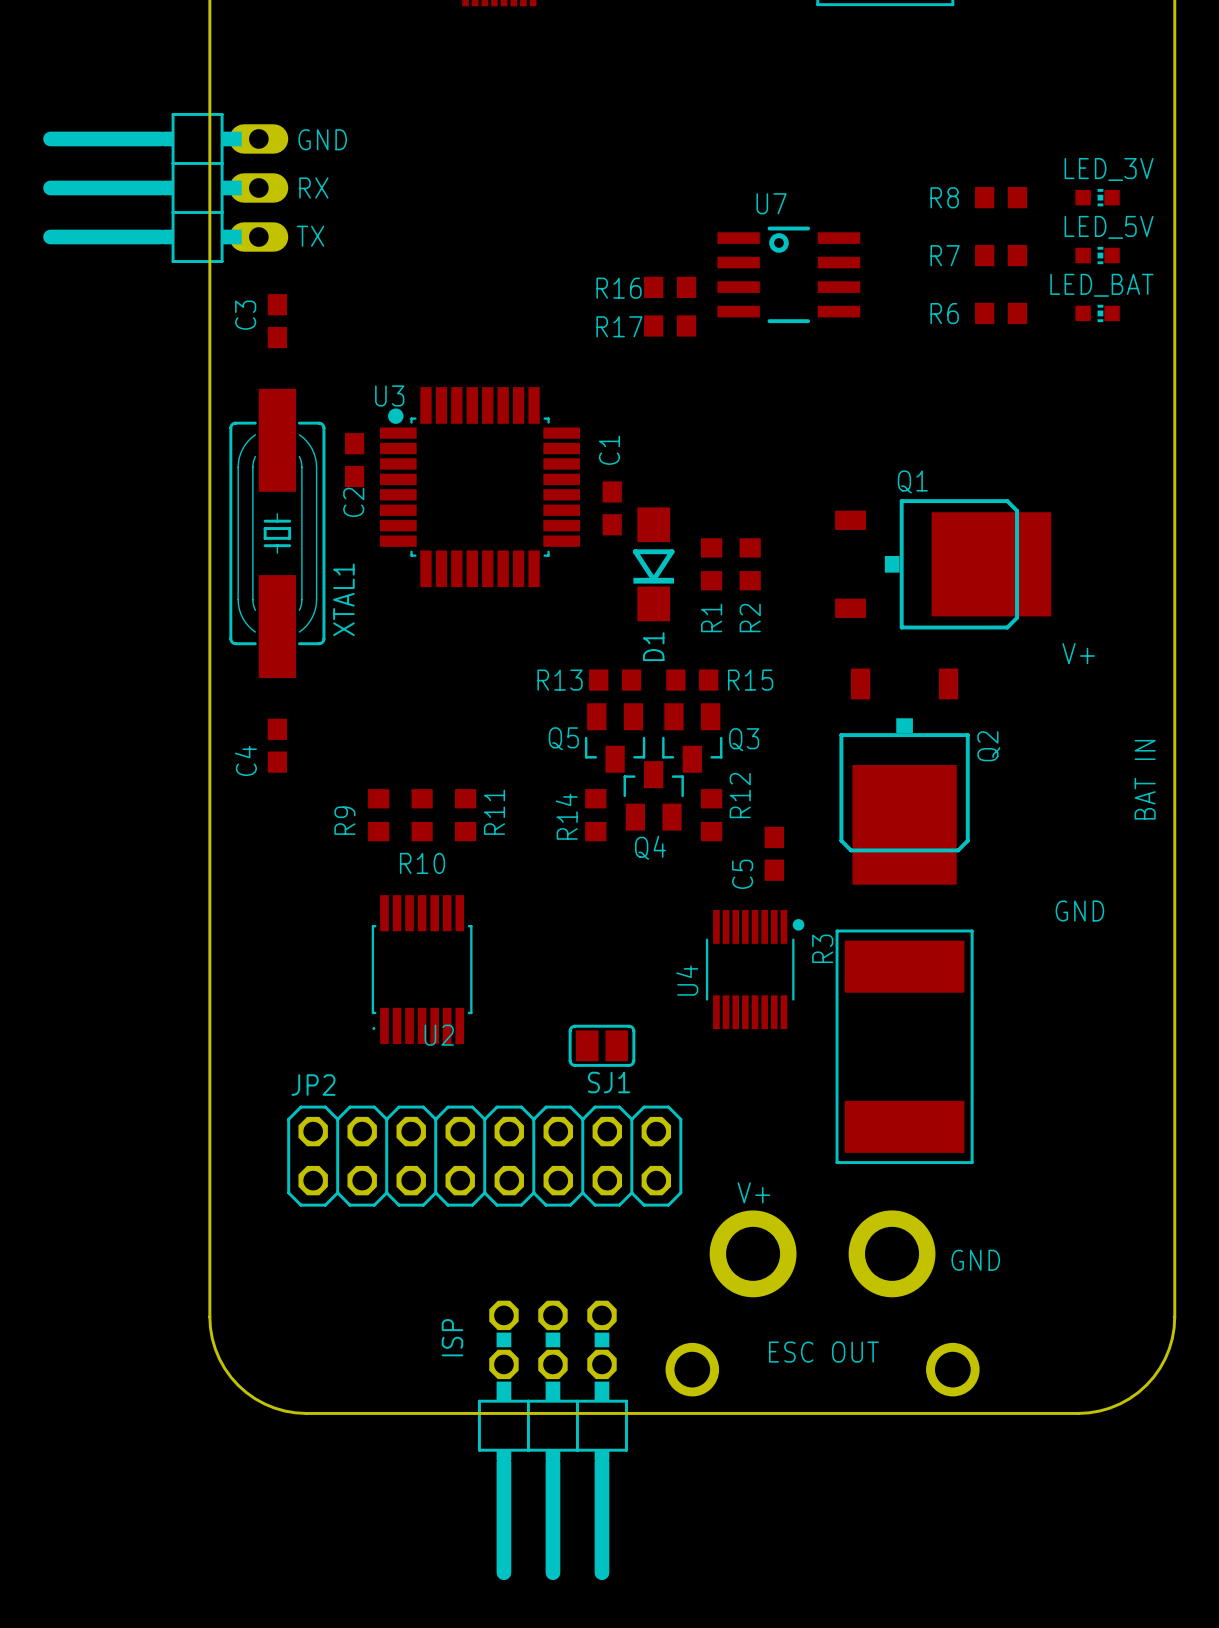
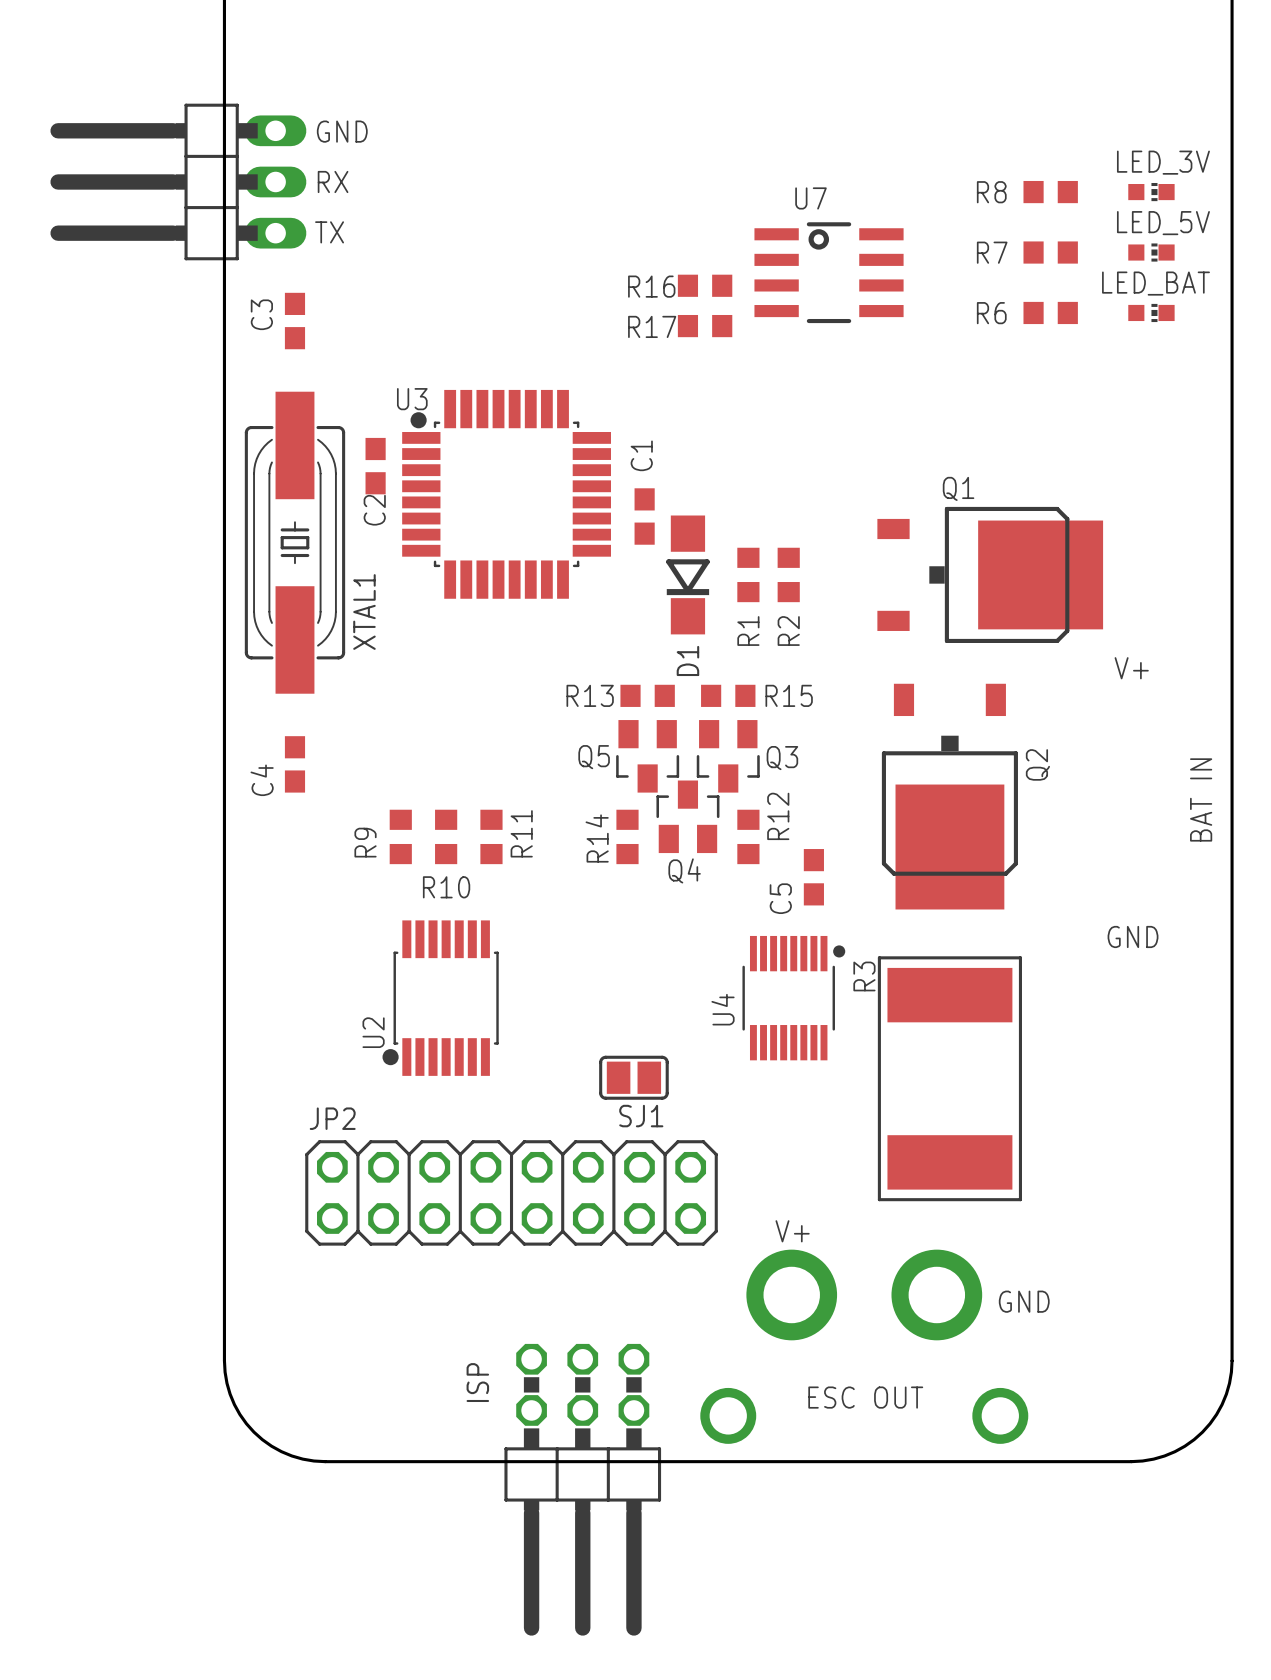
U2 footprint: [371, 895, 473, 1045] -> [382, 920, 499, 1076]
U2 name rotation: 0° (439, 1035) -> 90° counterclockwise (373, 1032)
U2 name position: U2 (439, 1035) -> U2 (373, 1032)

